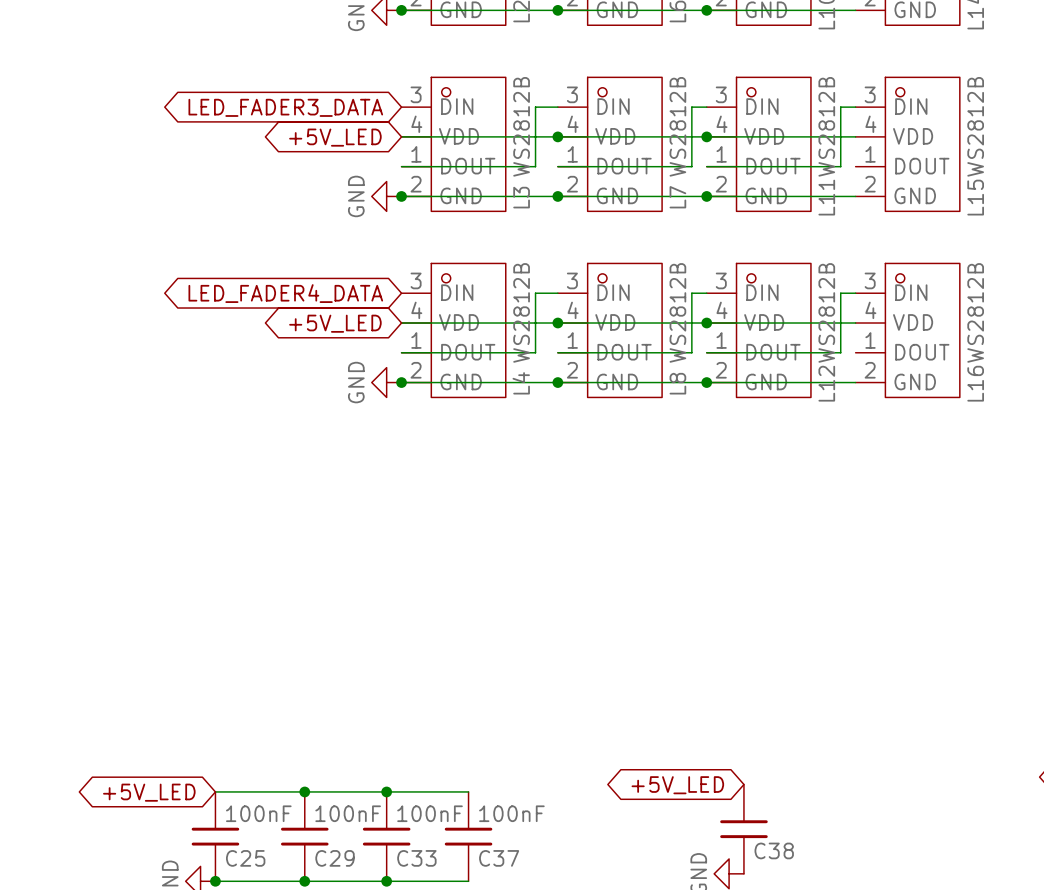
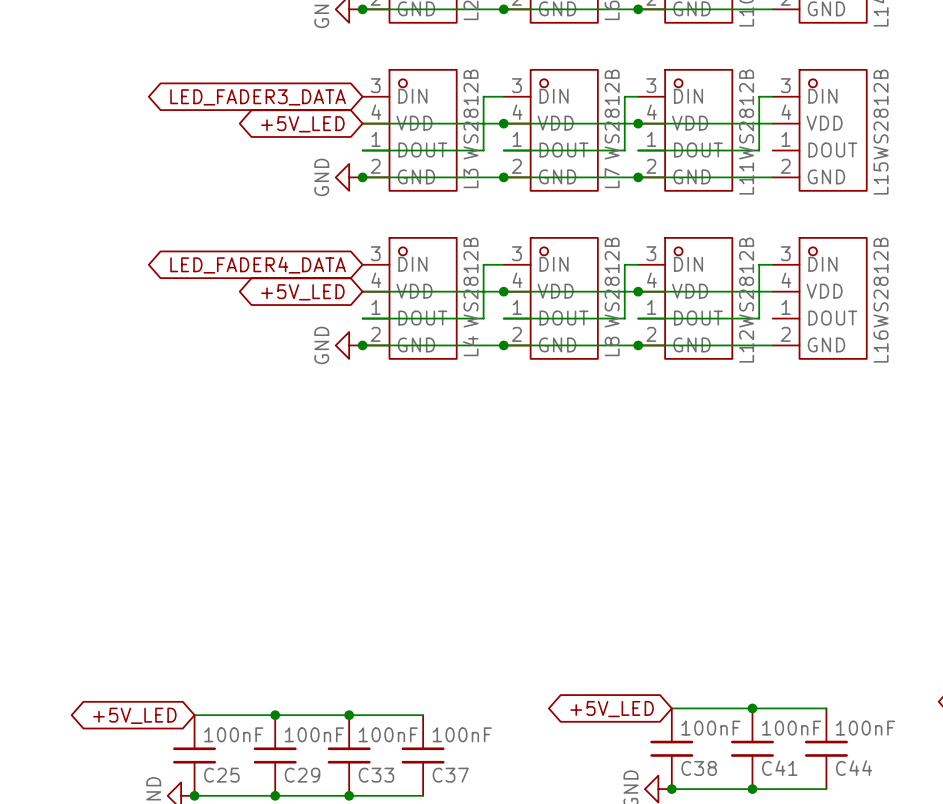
wire: none -> (671, 708) (826, 708)
junction: none -> (752, 708)
C38 value: none -> 100nF (710, 728)
C41: none -> 100nF (752, 748)
C44: none -> 100nF (826, 748)
wire: none -> (671, 789) (826, 789)
junction: none -> (671, 789)
junction: none -> (752, 789)

